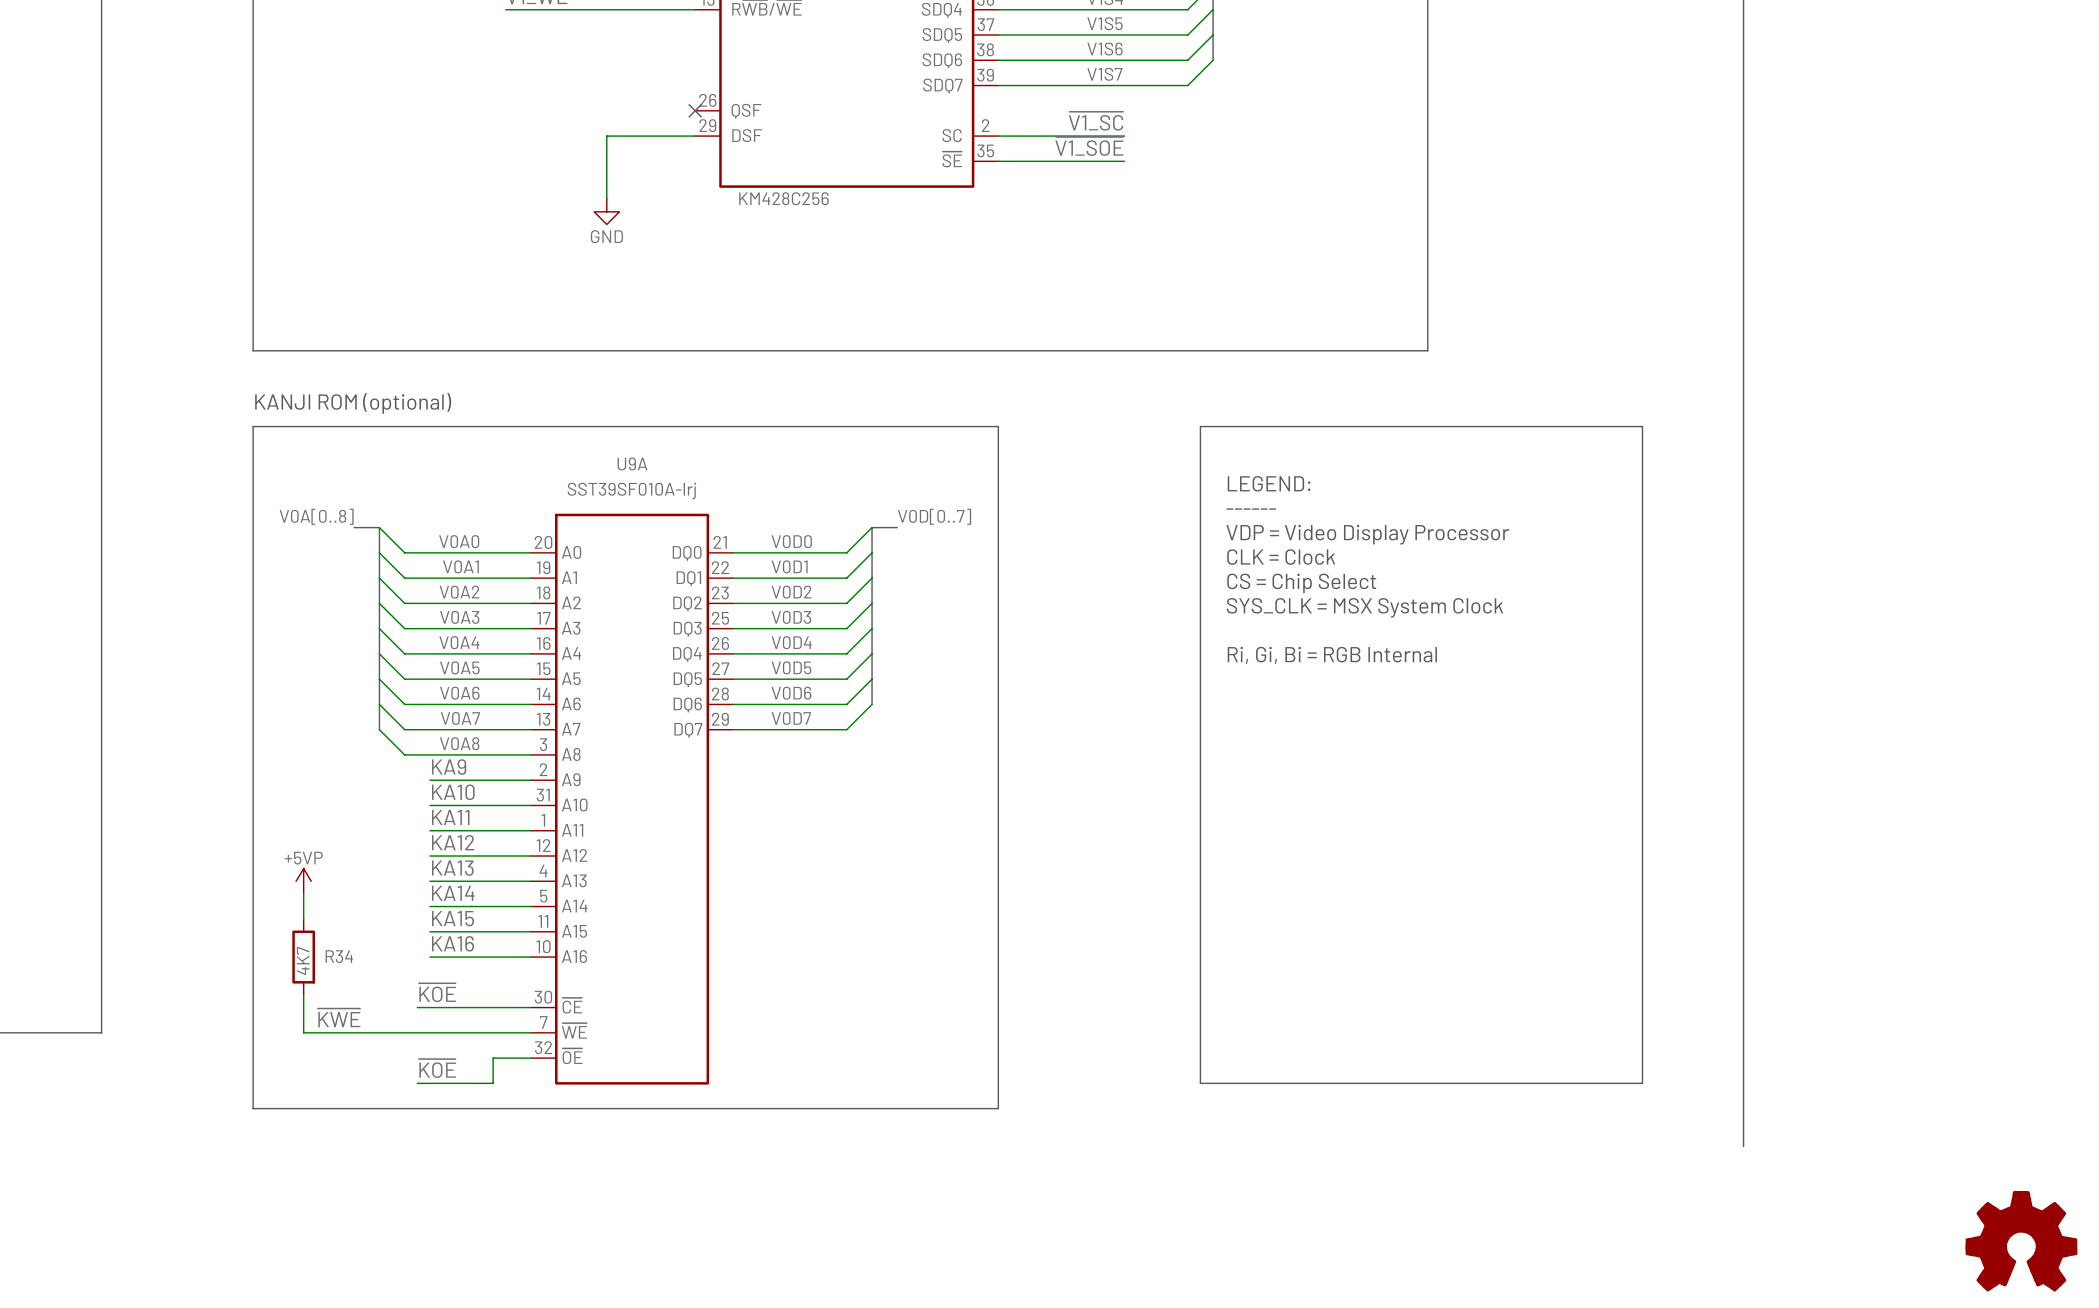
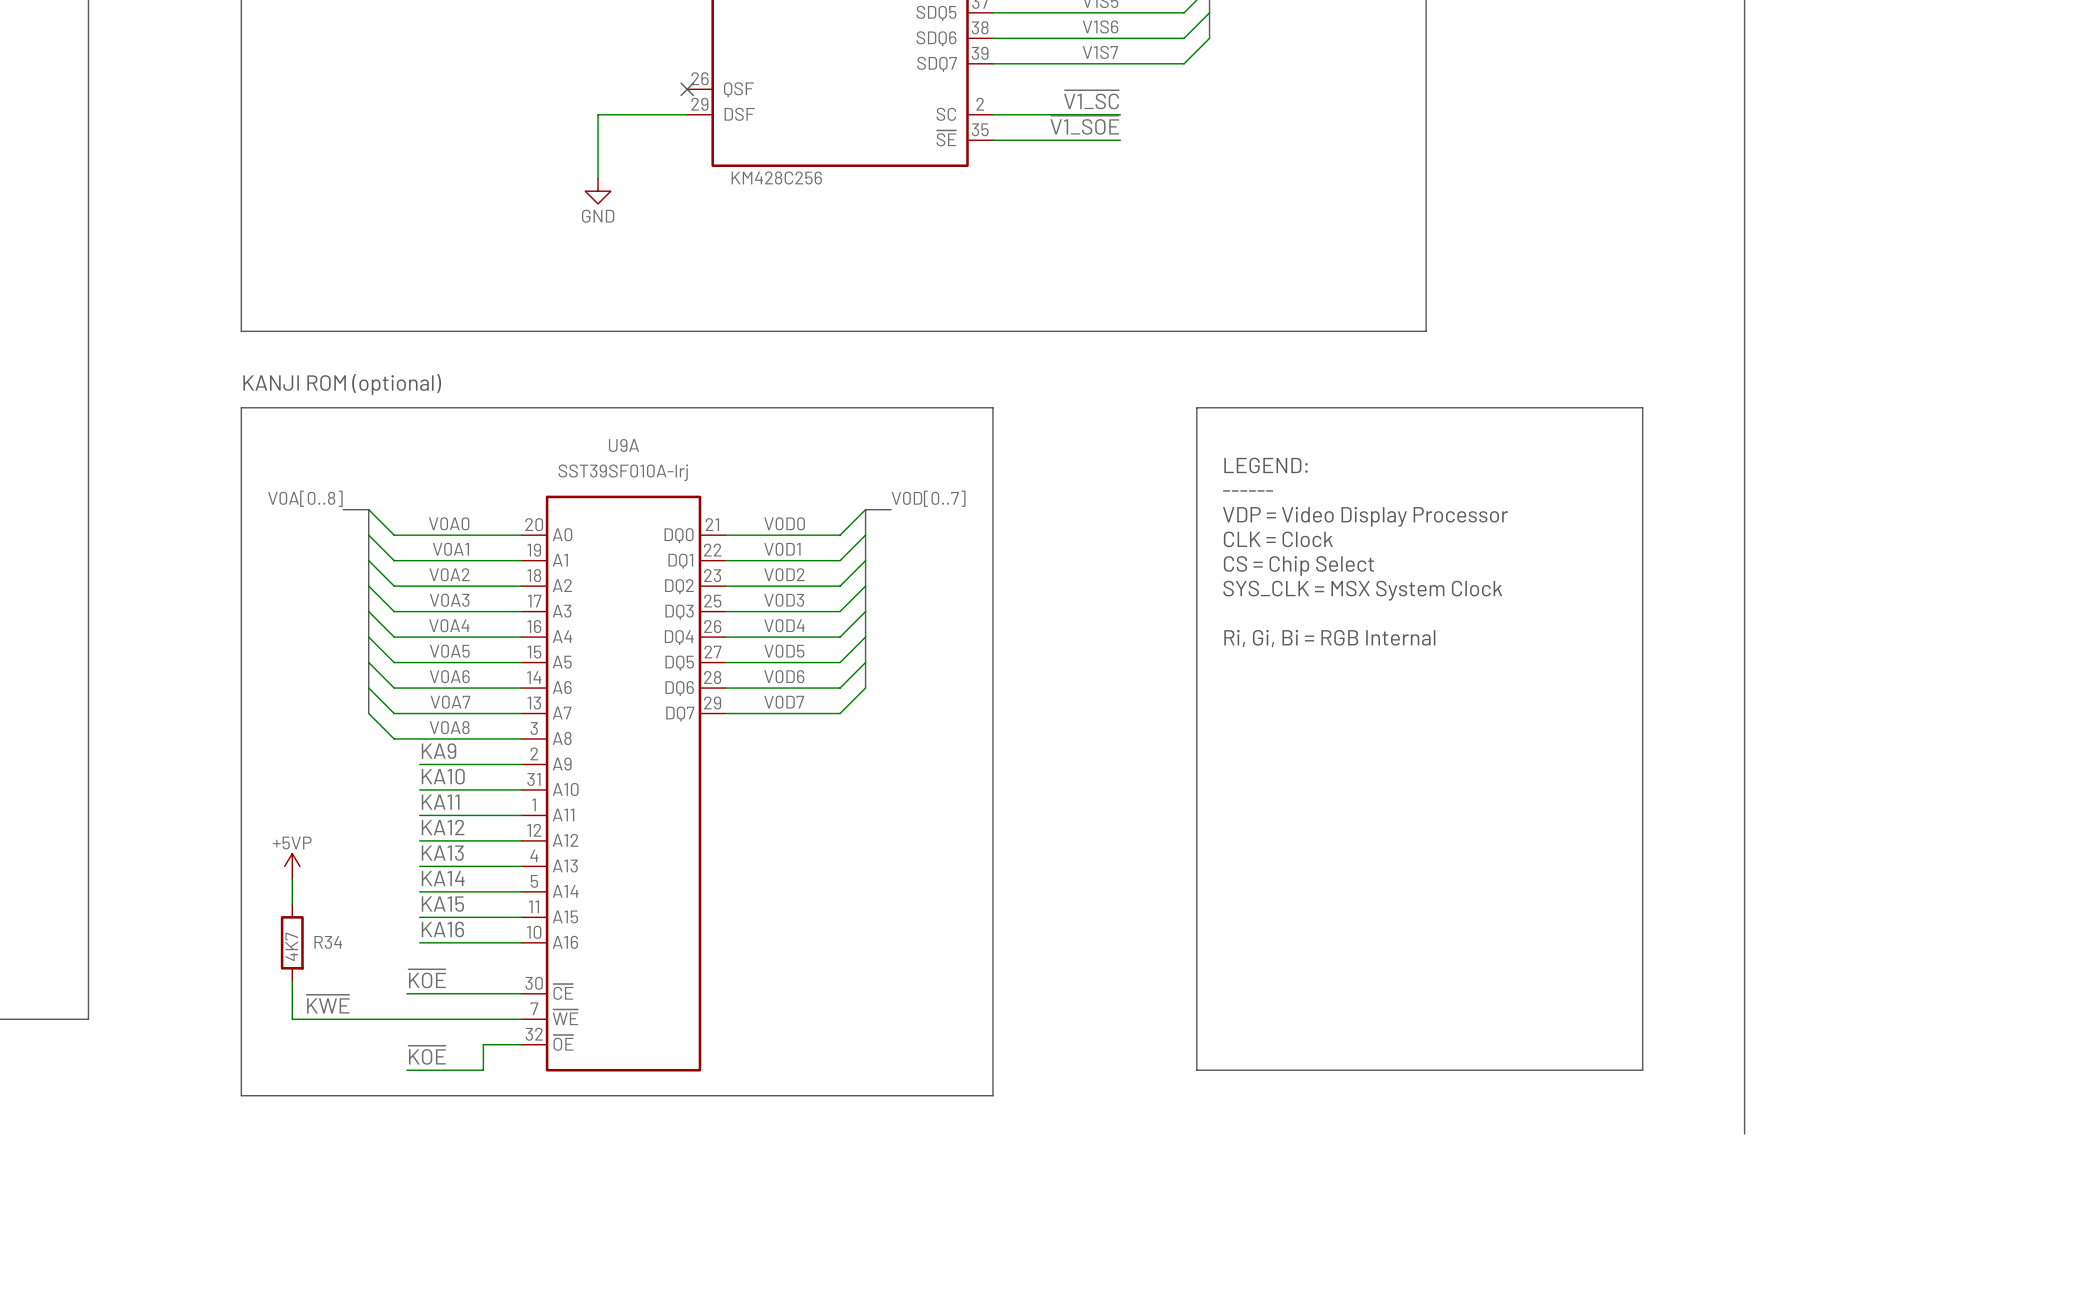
part: (2021, 1241) -> none

